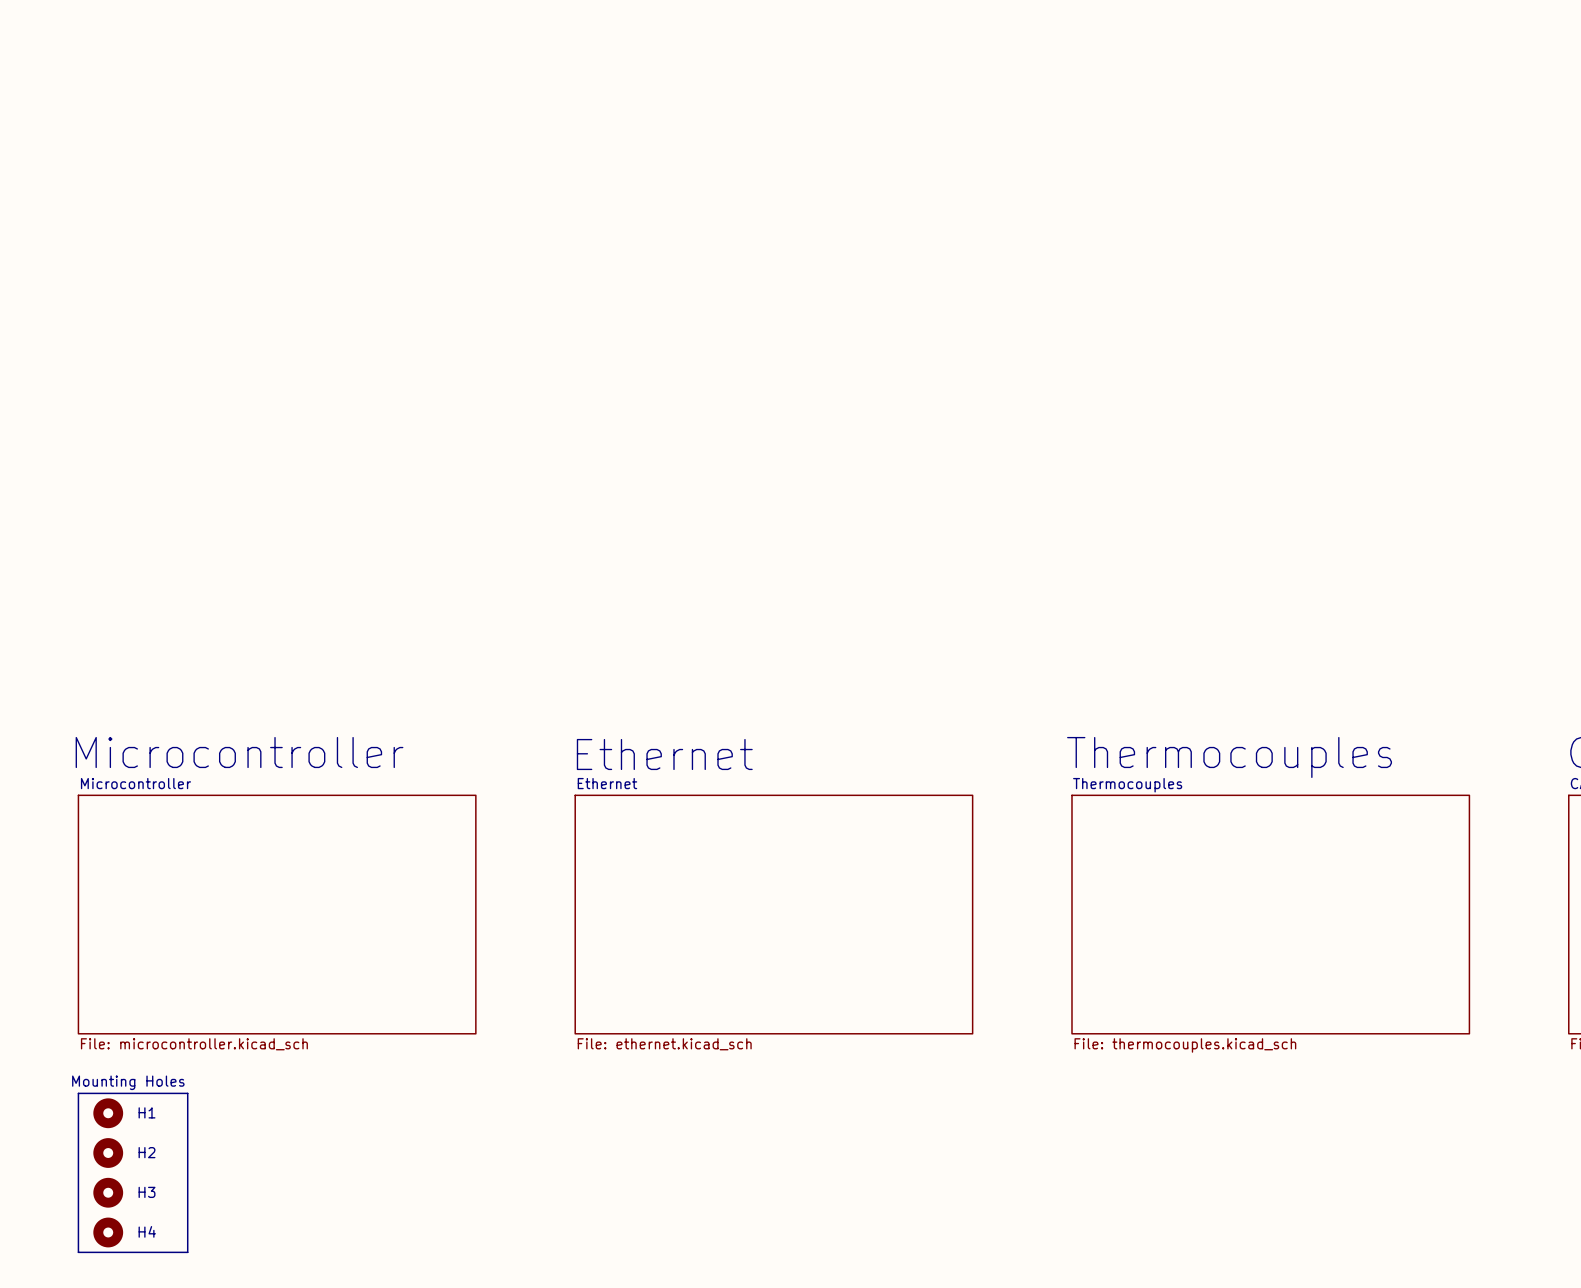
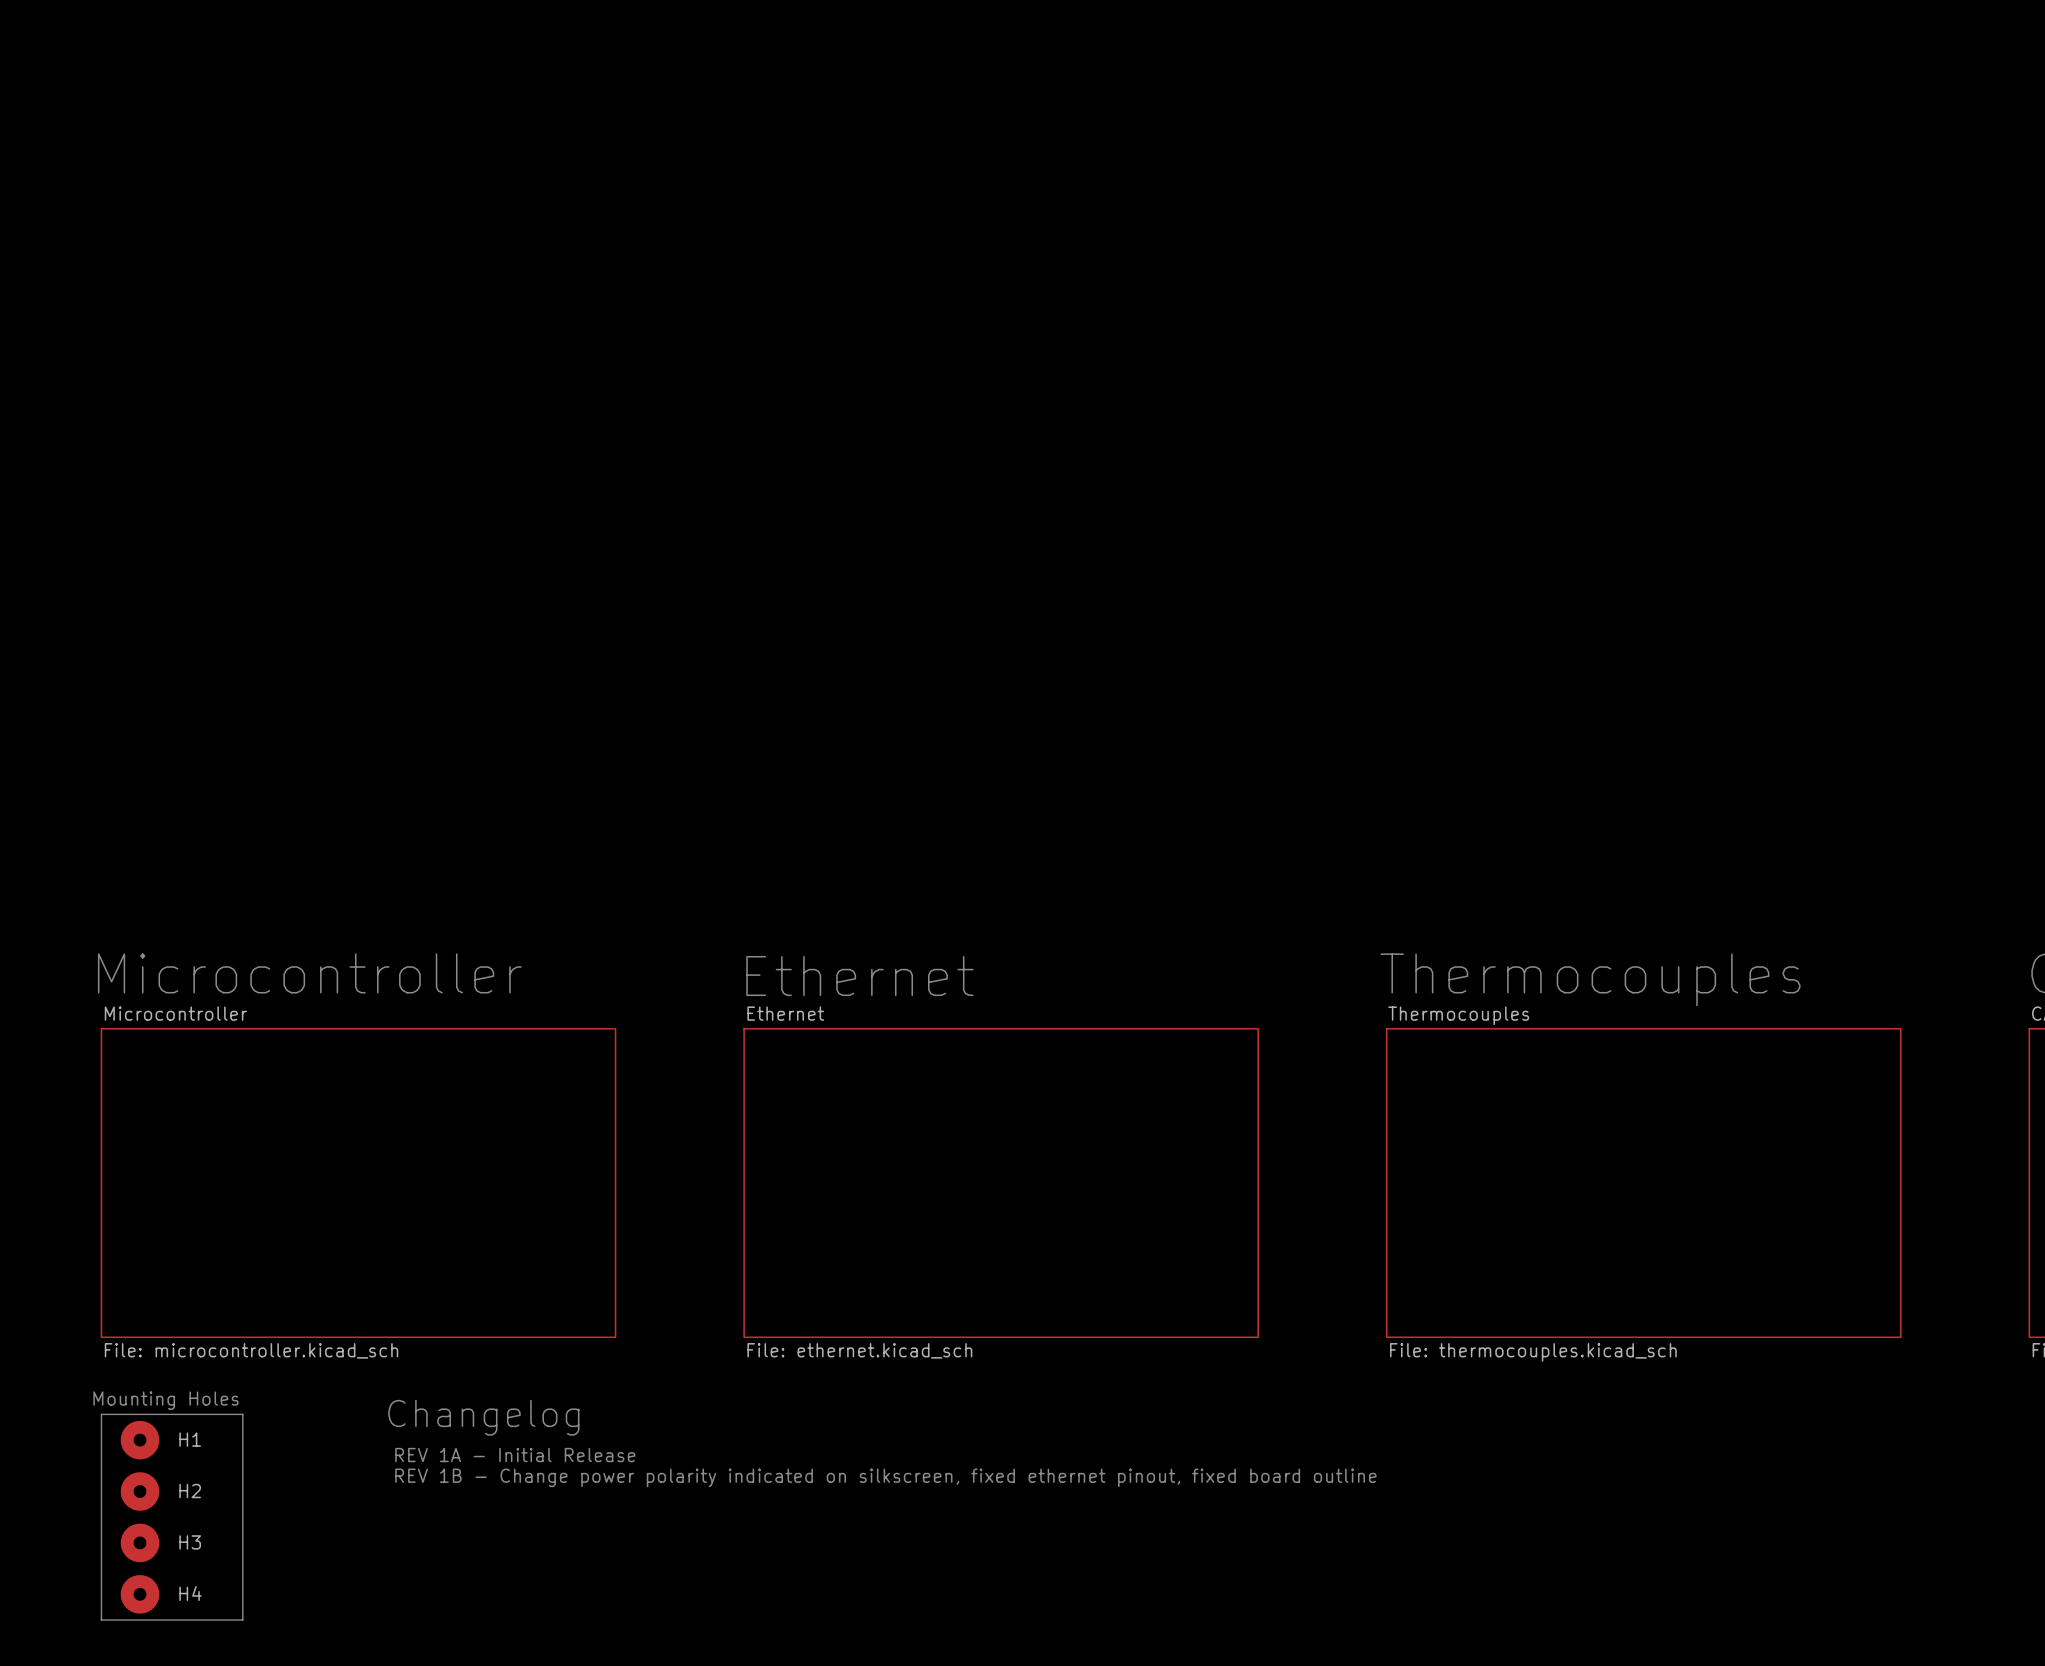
text: none -> Changelog (483, 1417)
text: none -> REV 1A - Initial Release (515, 1455)
text: none -> REV 1B - Change power polarity indicated on silkscreen, fixed ethernet pinout, fixed board outline (885, 1477)

